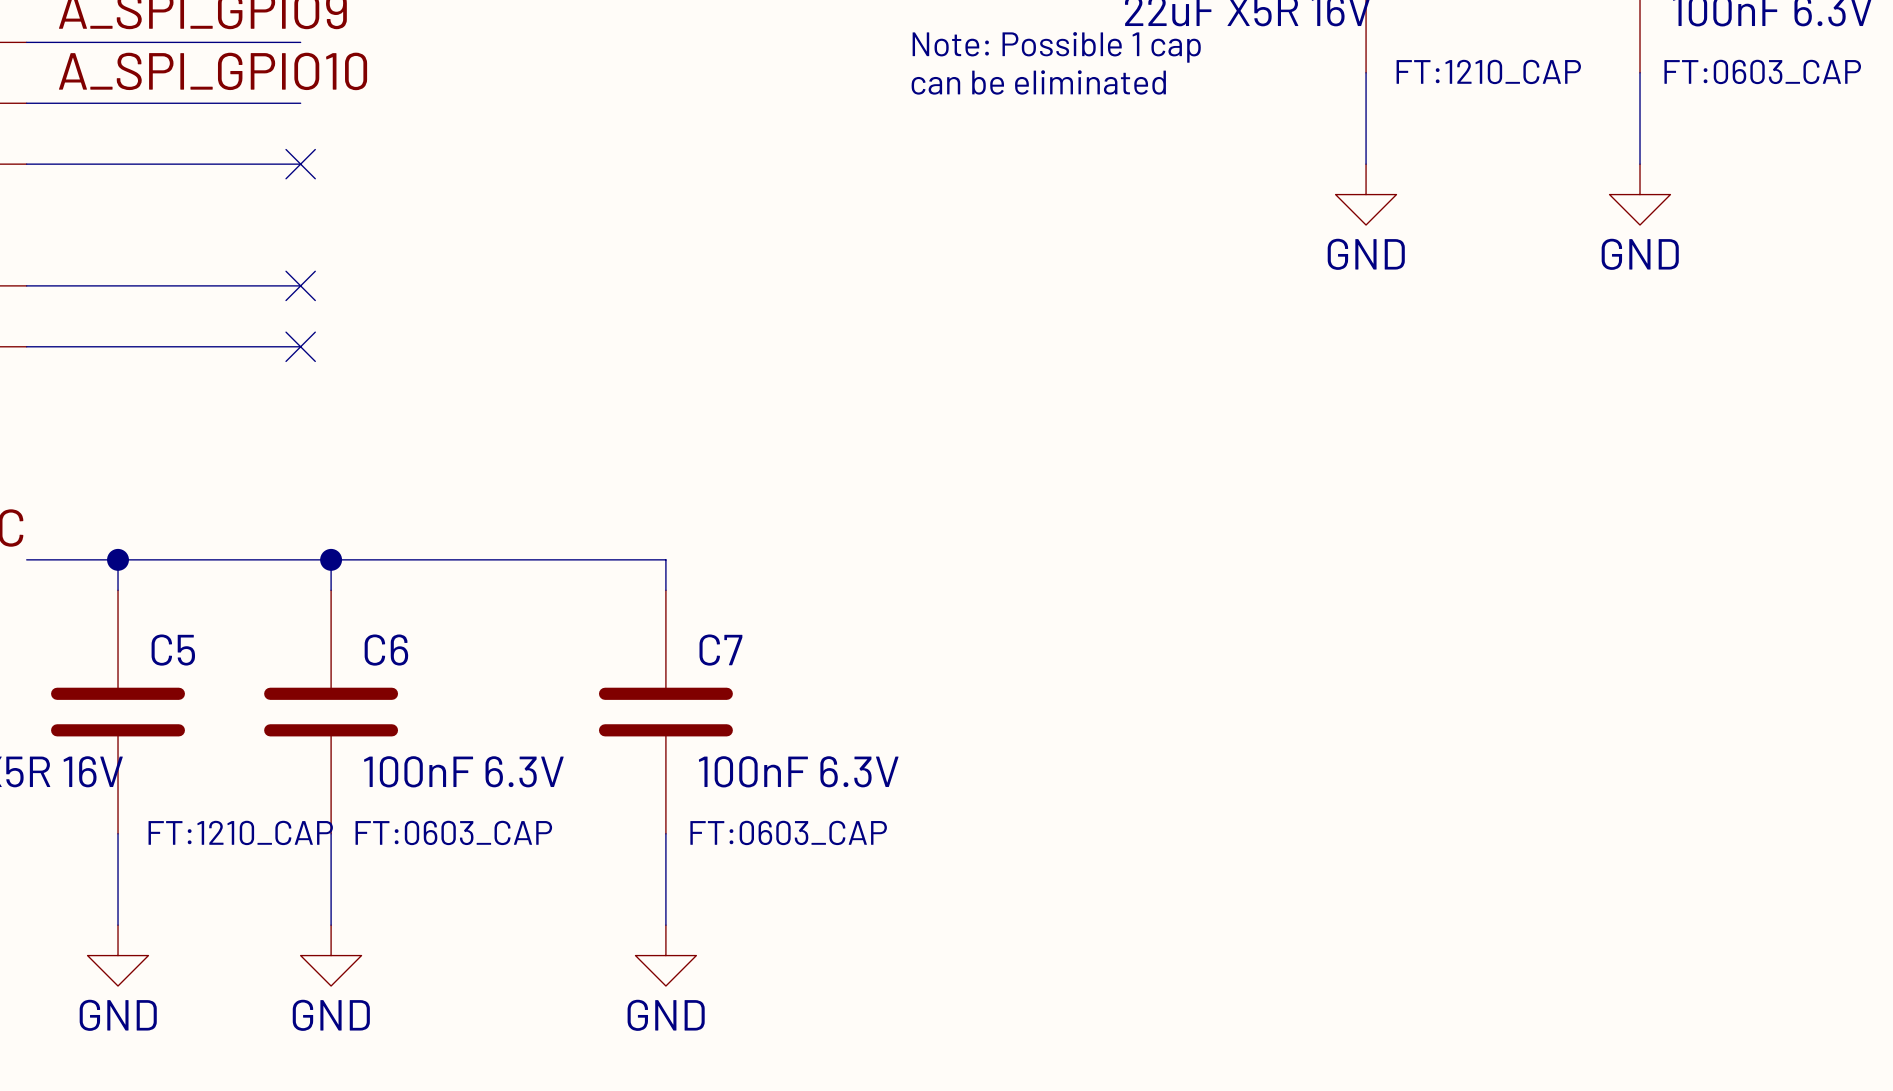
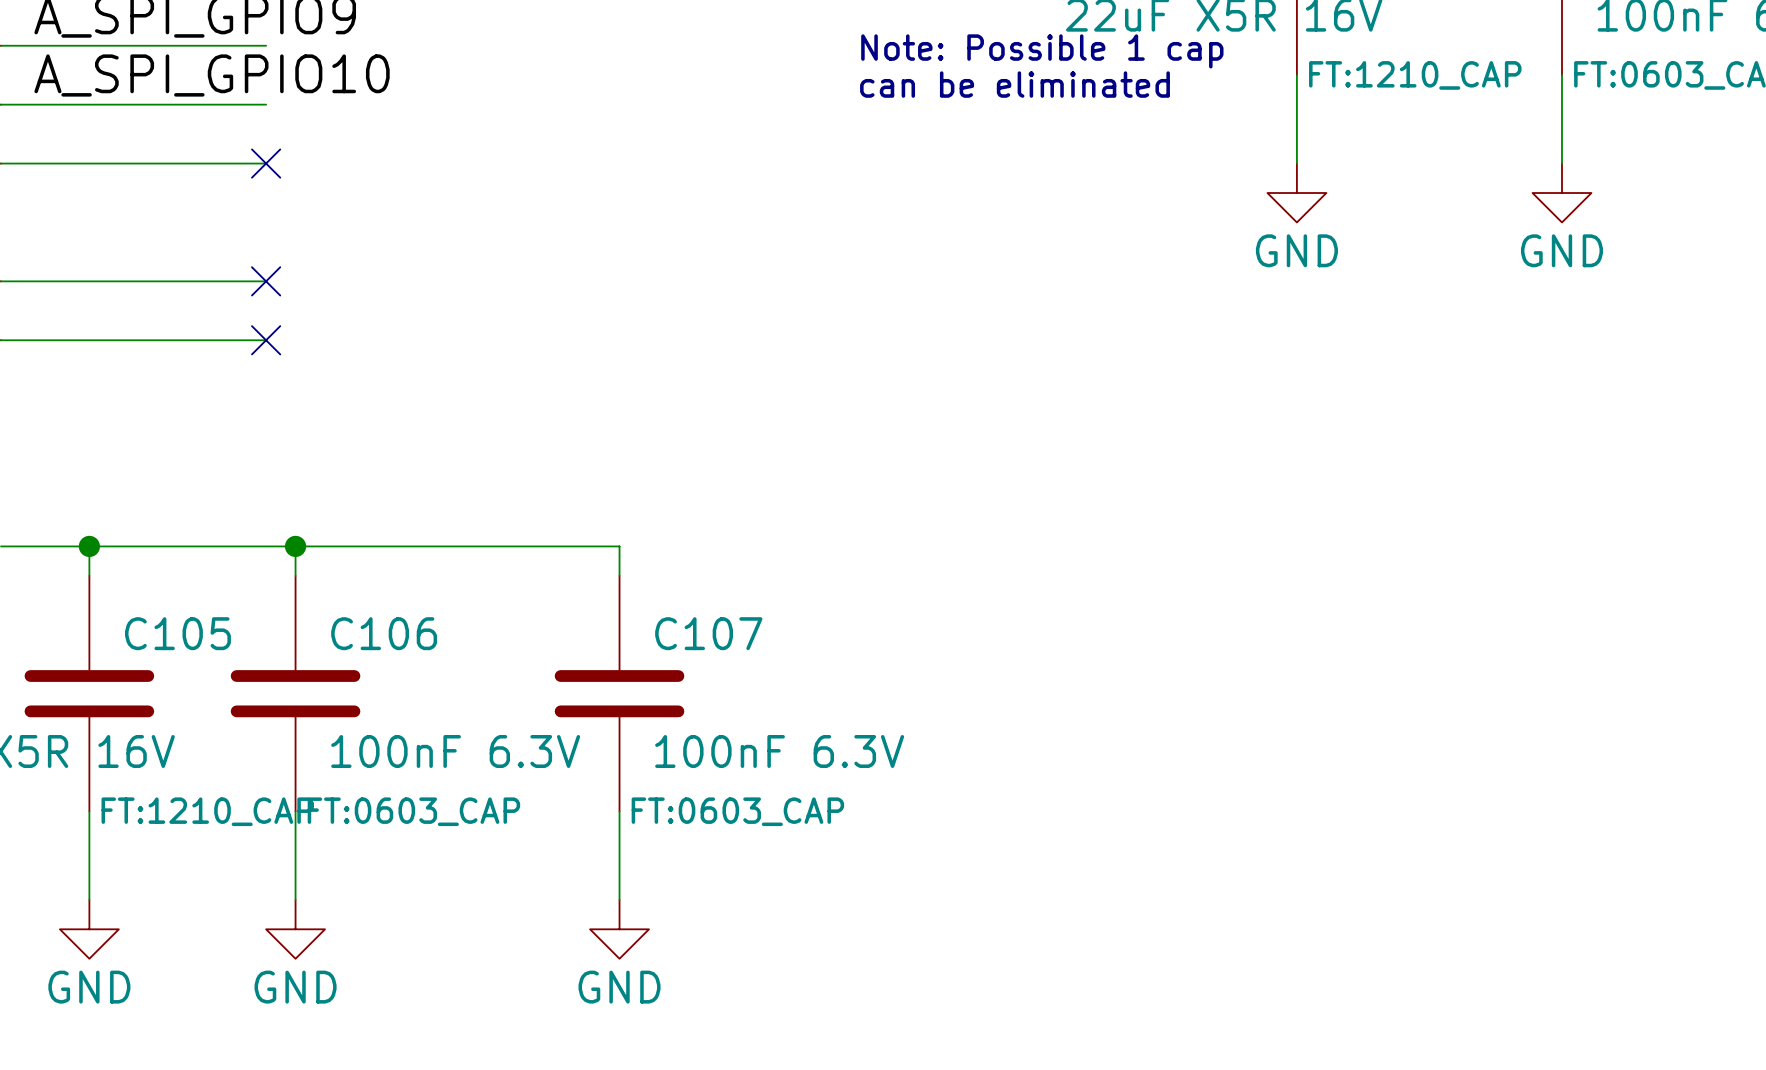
C5 name: C5 (173, 650) -> C105 (177, 633)
C6 name: C6 (386, 650) -> C106 (384, 633)
C7 name: C7 (720, 650) -> C107 (708, 633)

